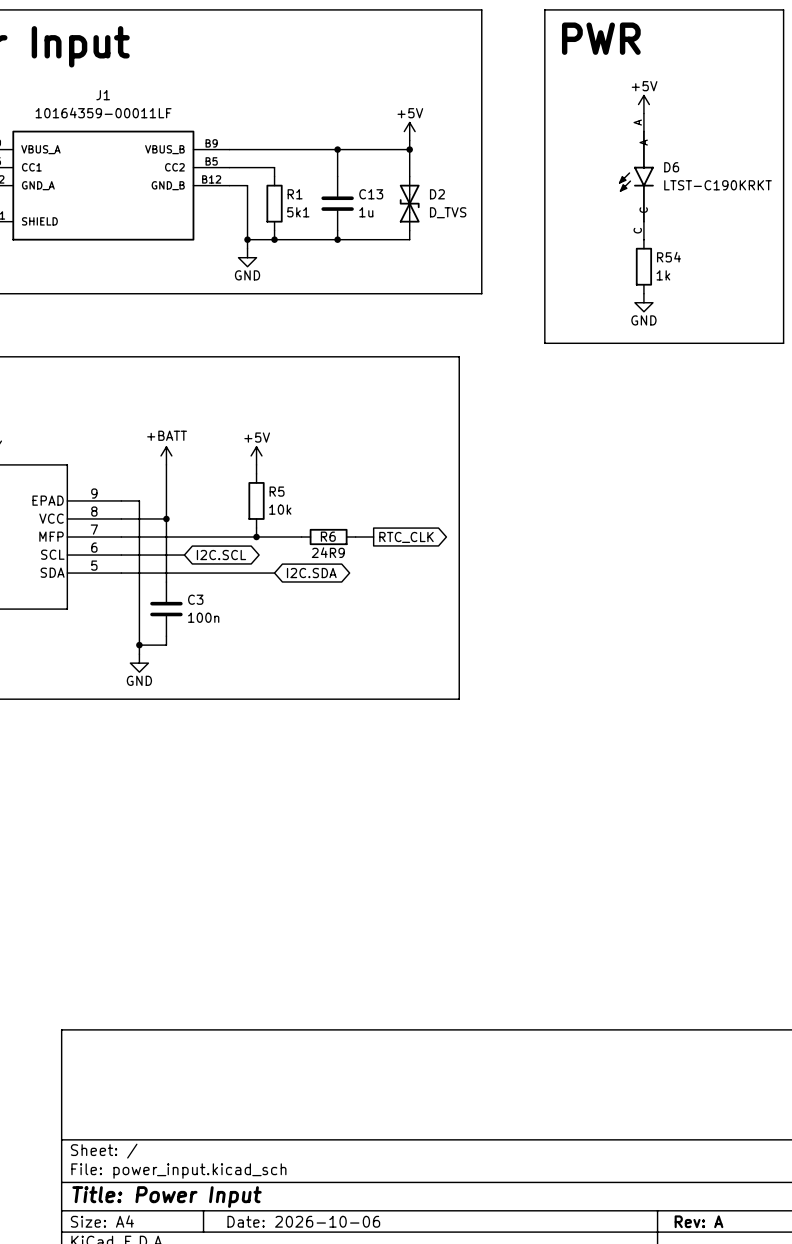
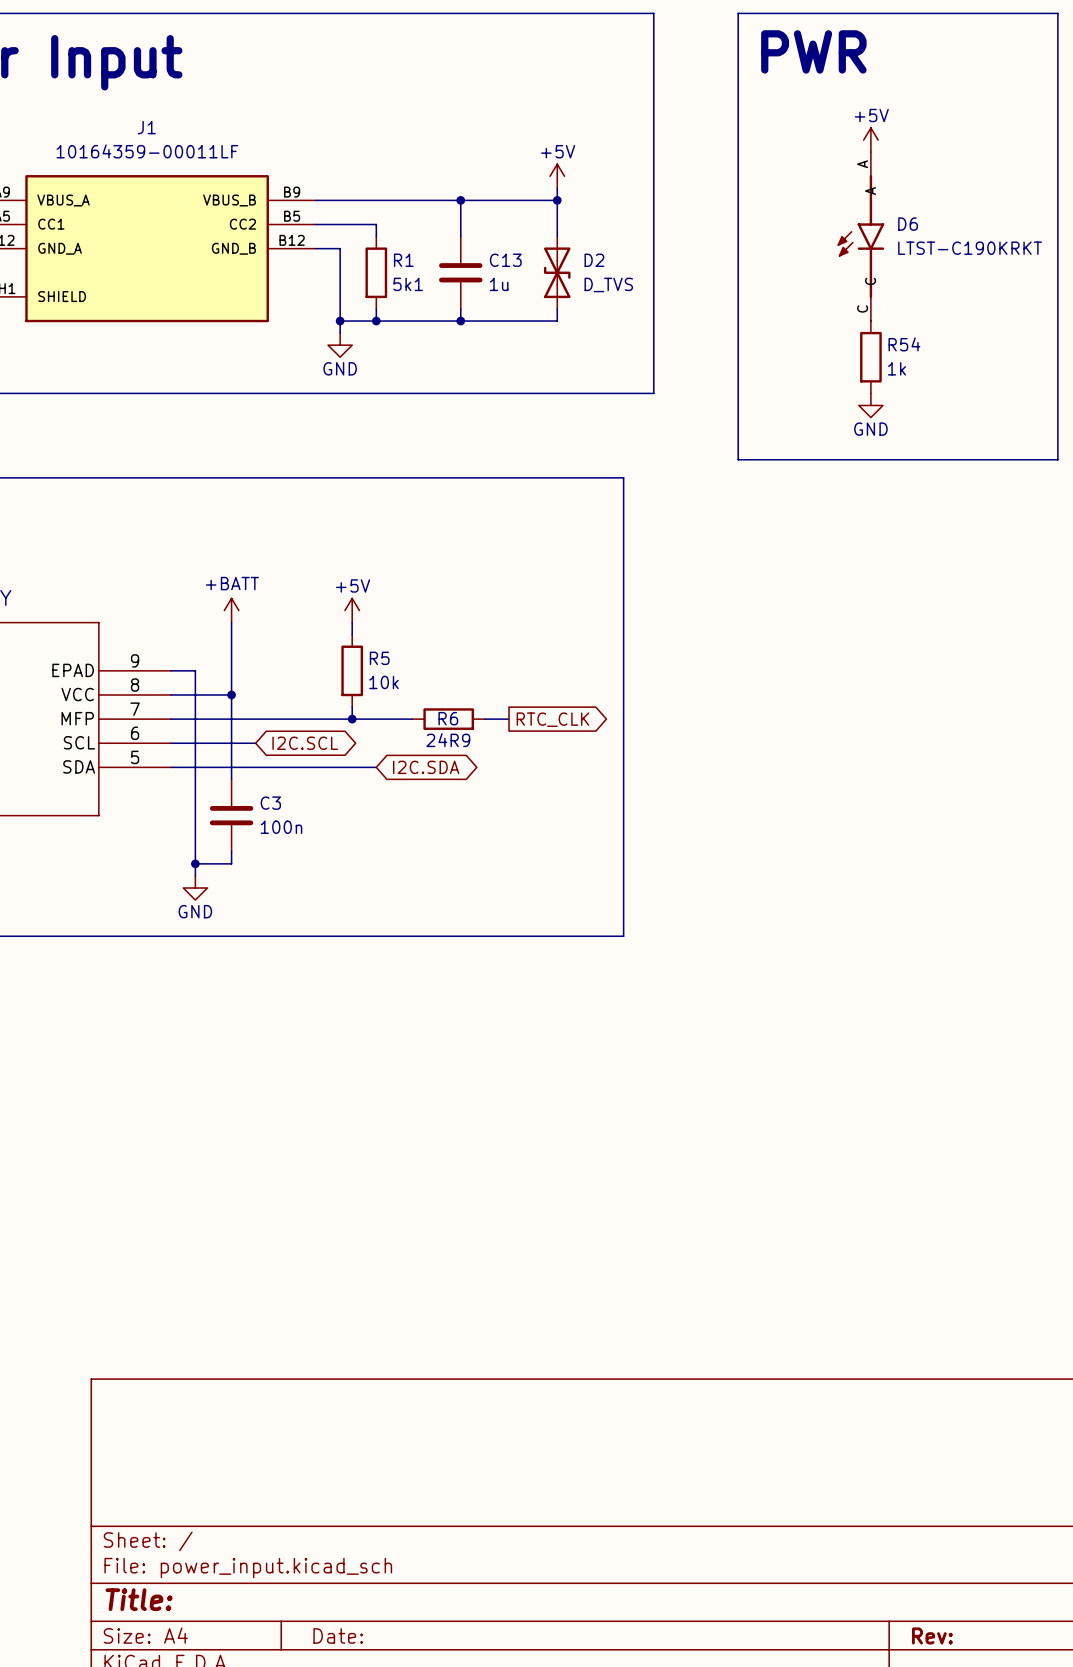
title block: Title: Power Input (167, 1197) -> Title: (139, 1599)
title block: Date: 2026-10-06 (303, 1221) -> Date: (338, 1635)
title block: Rev: A (699, 1221) -> Rev: (932, 1635)

